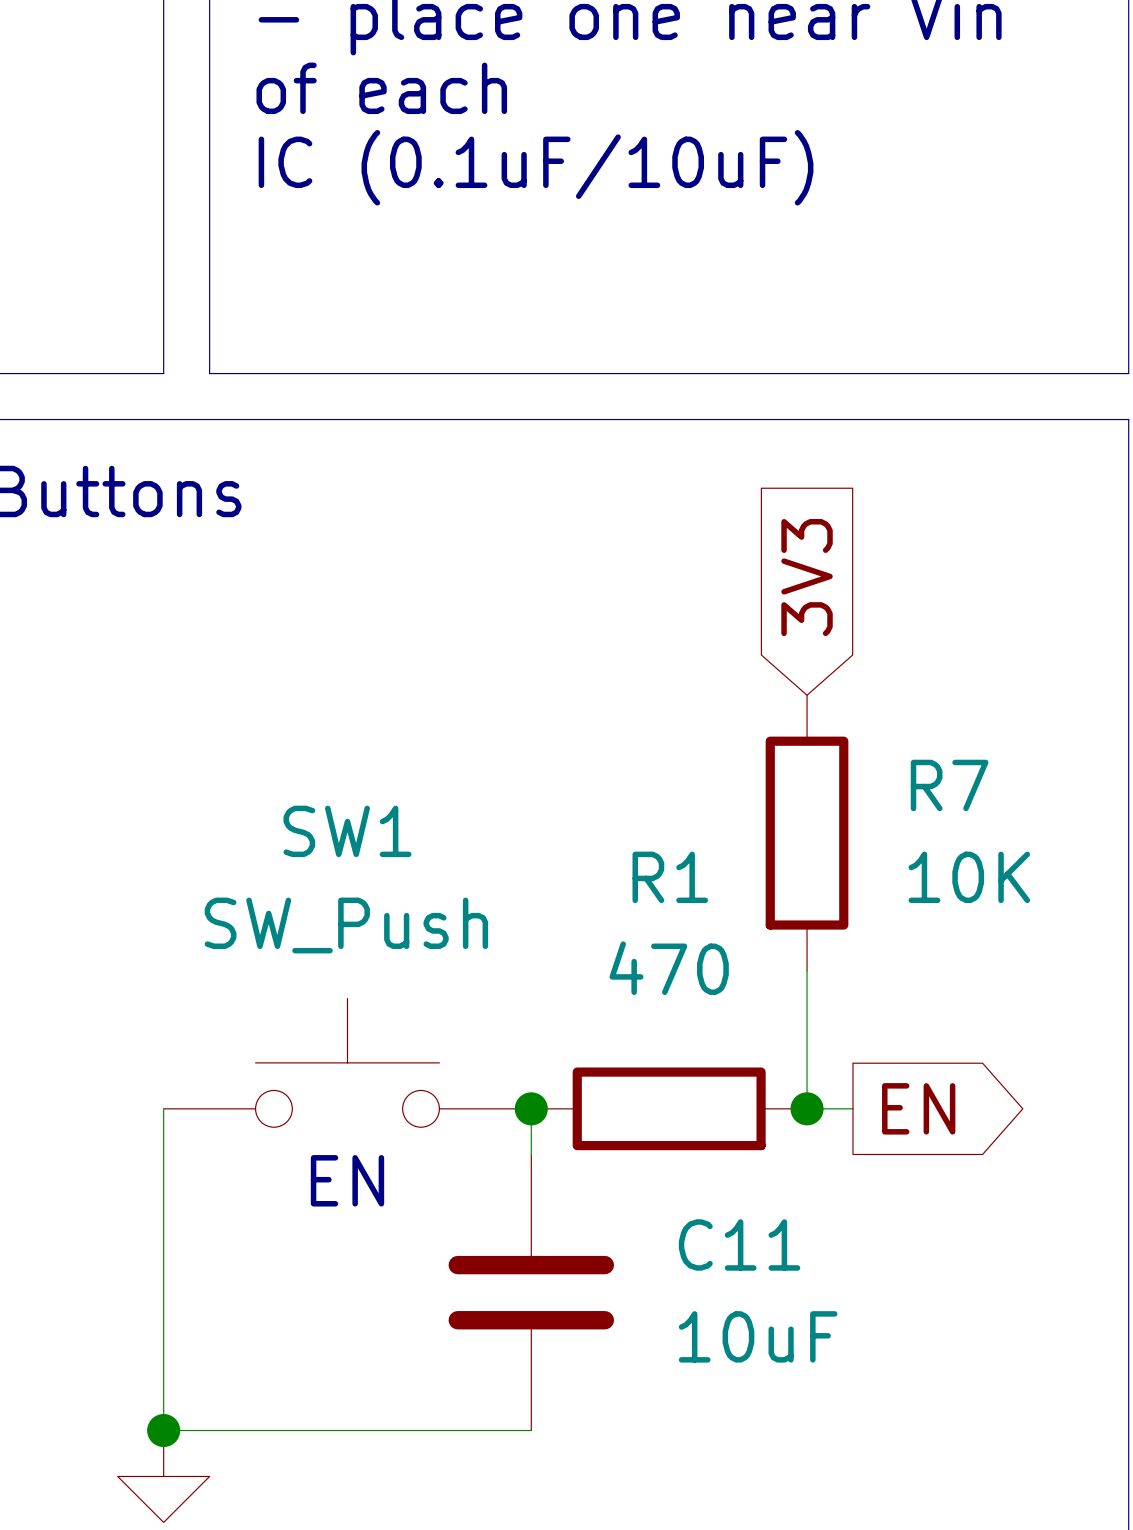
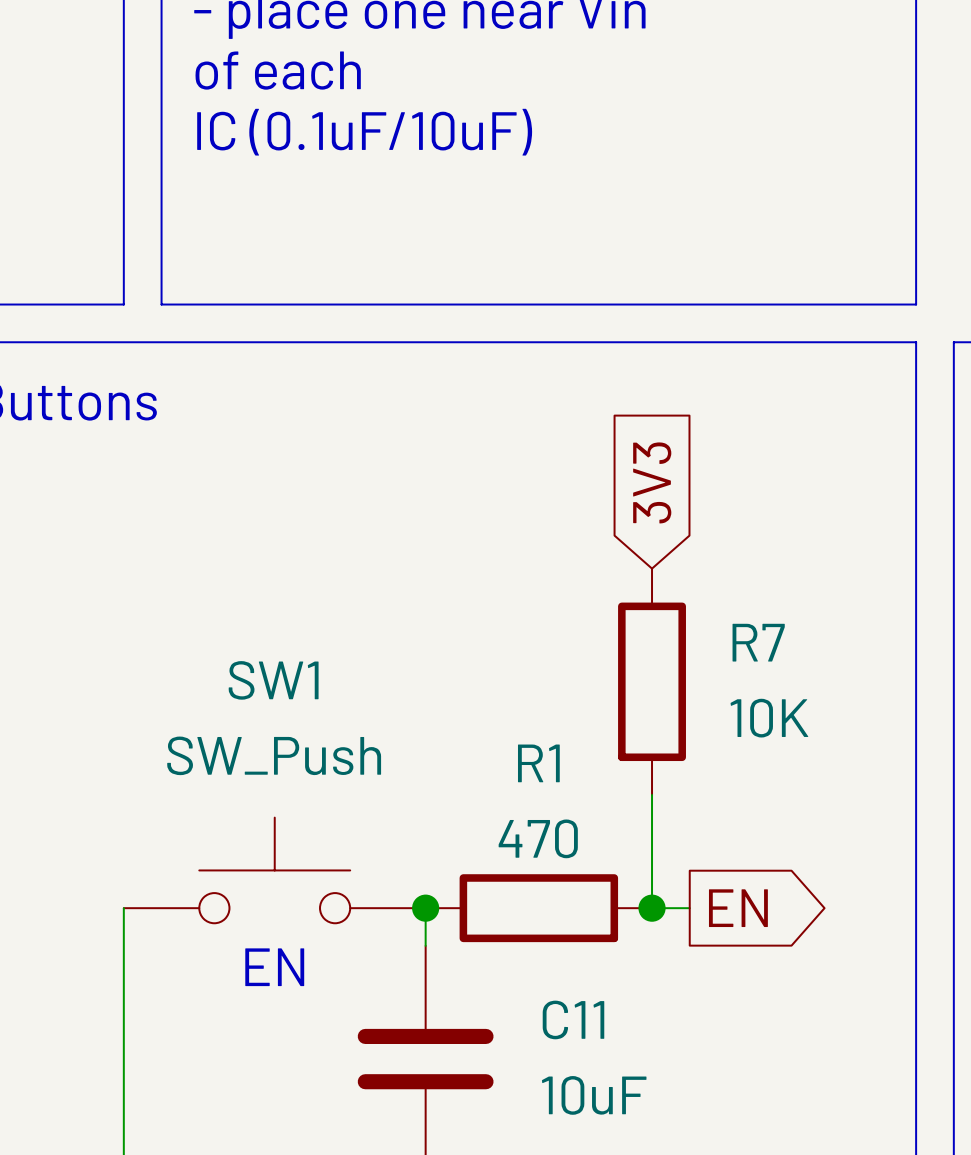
R1 name position: R1 (670, 877) -> R1 (538, 763)
R1 value position: 470 (669, 968) -> 470 (538, 838)

